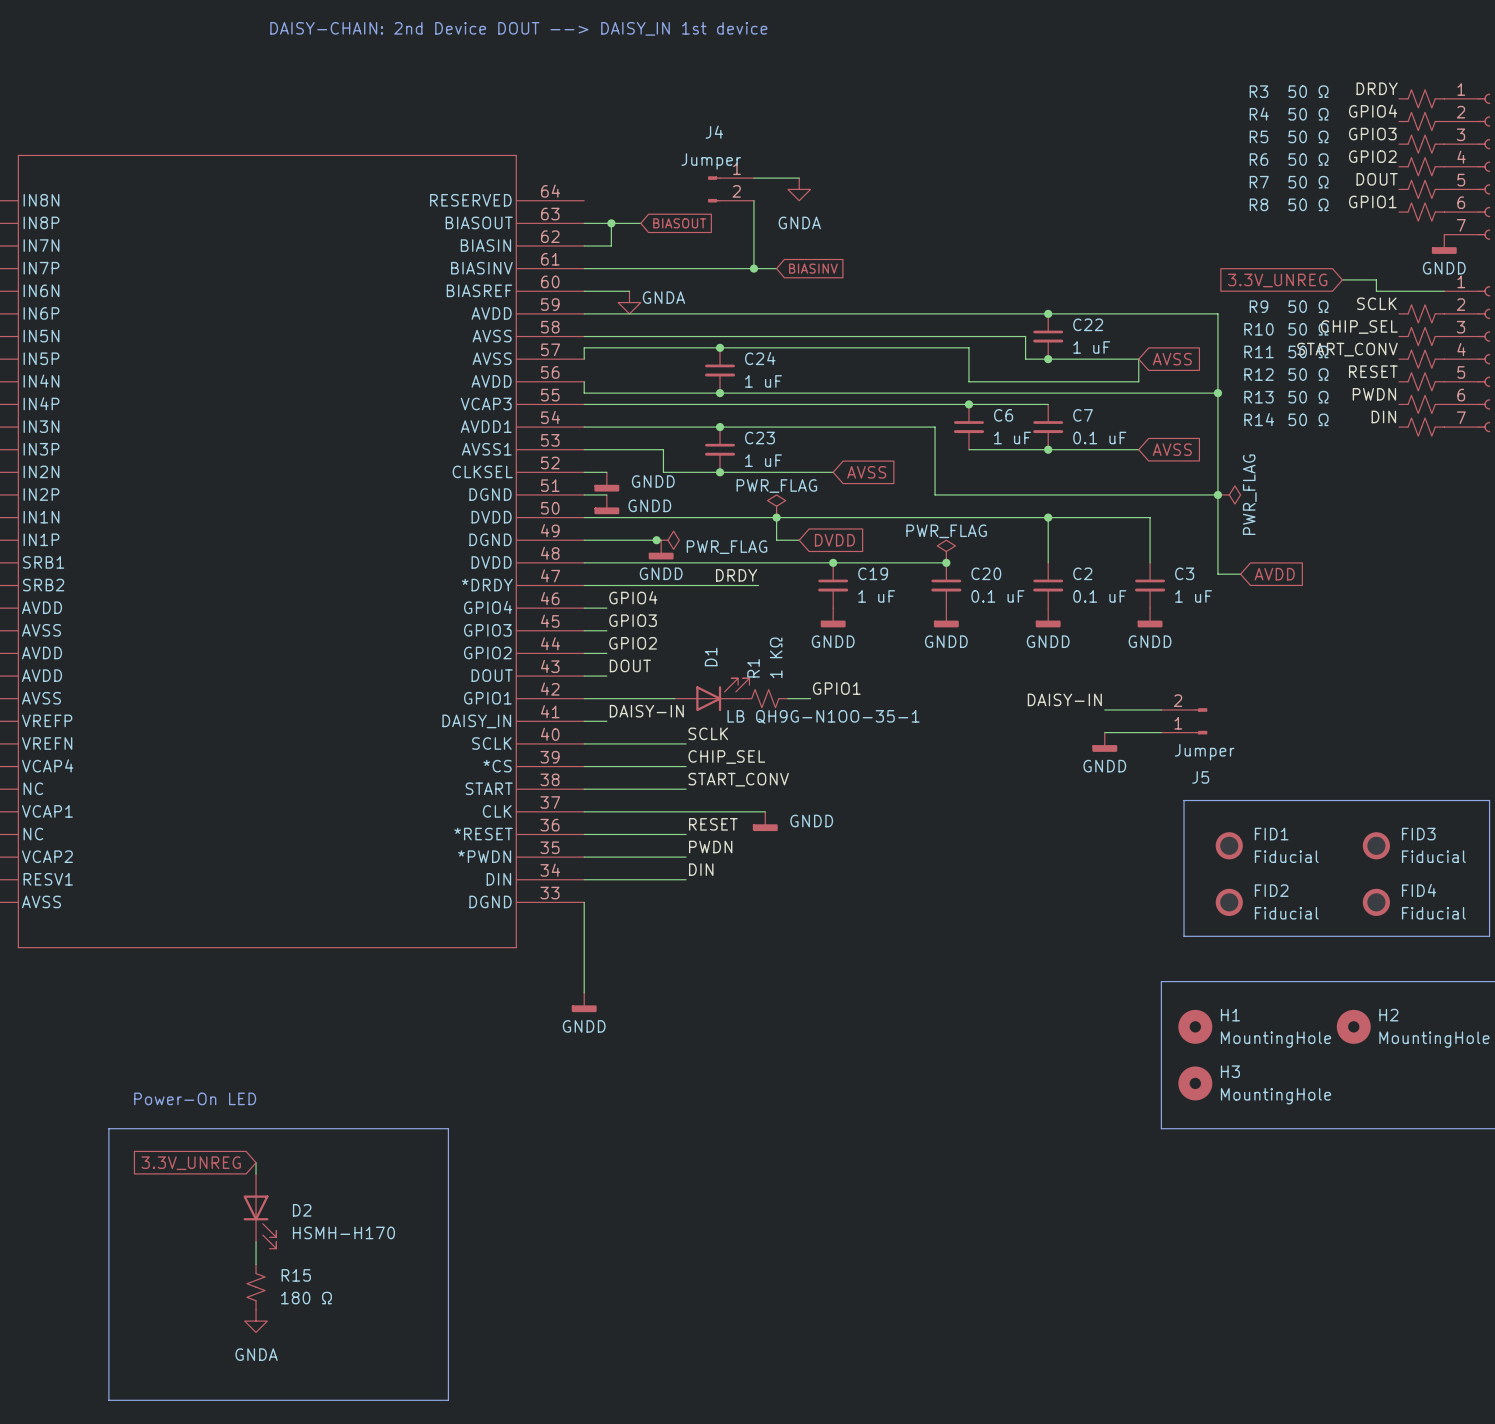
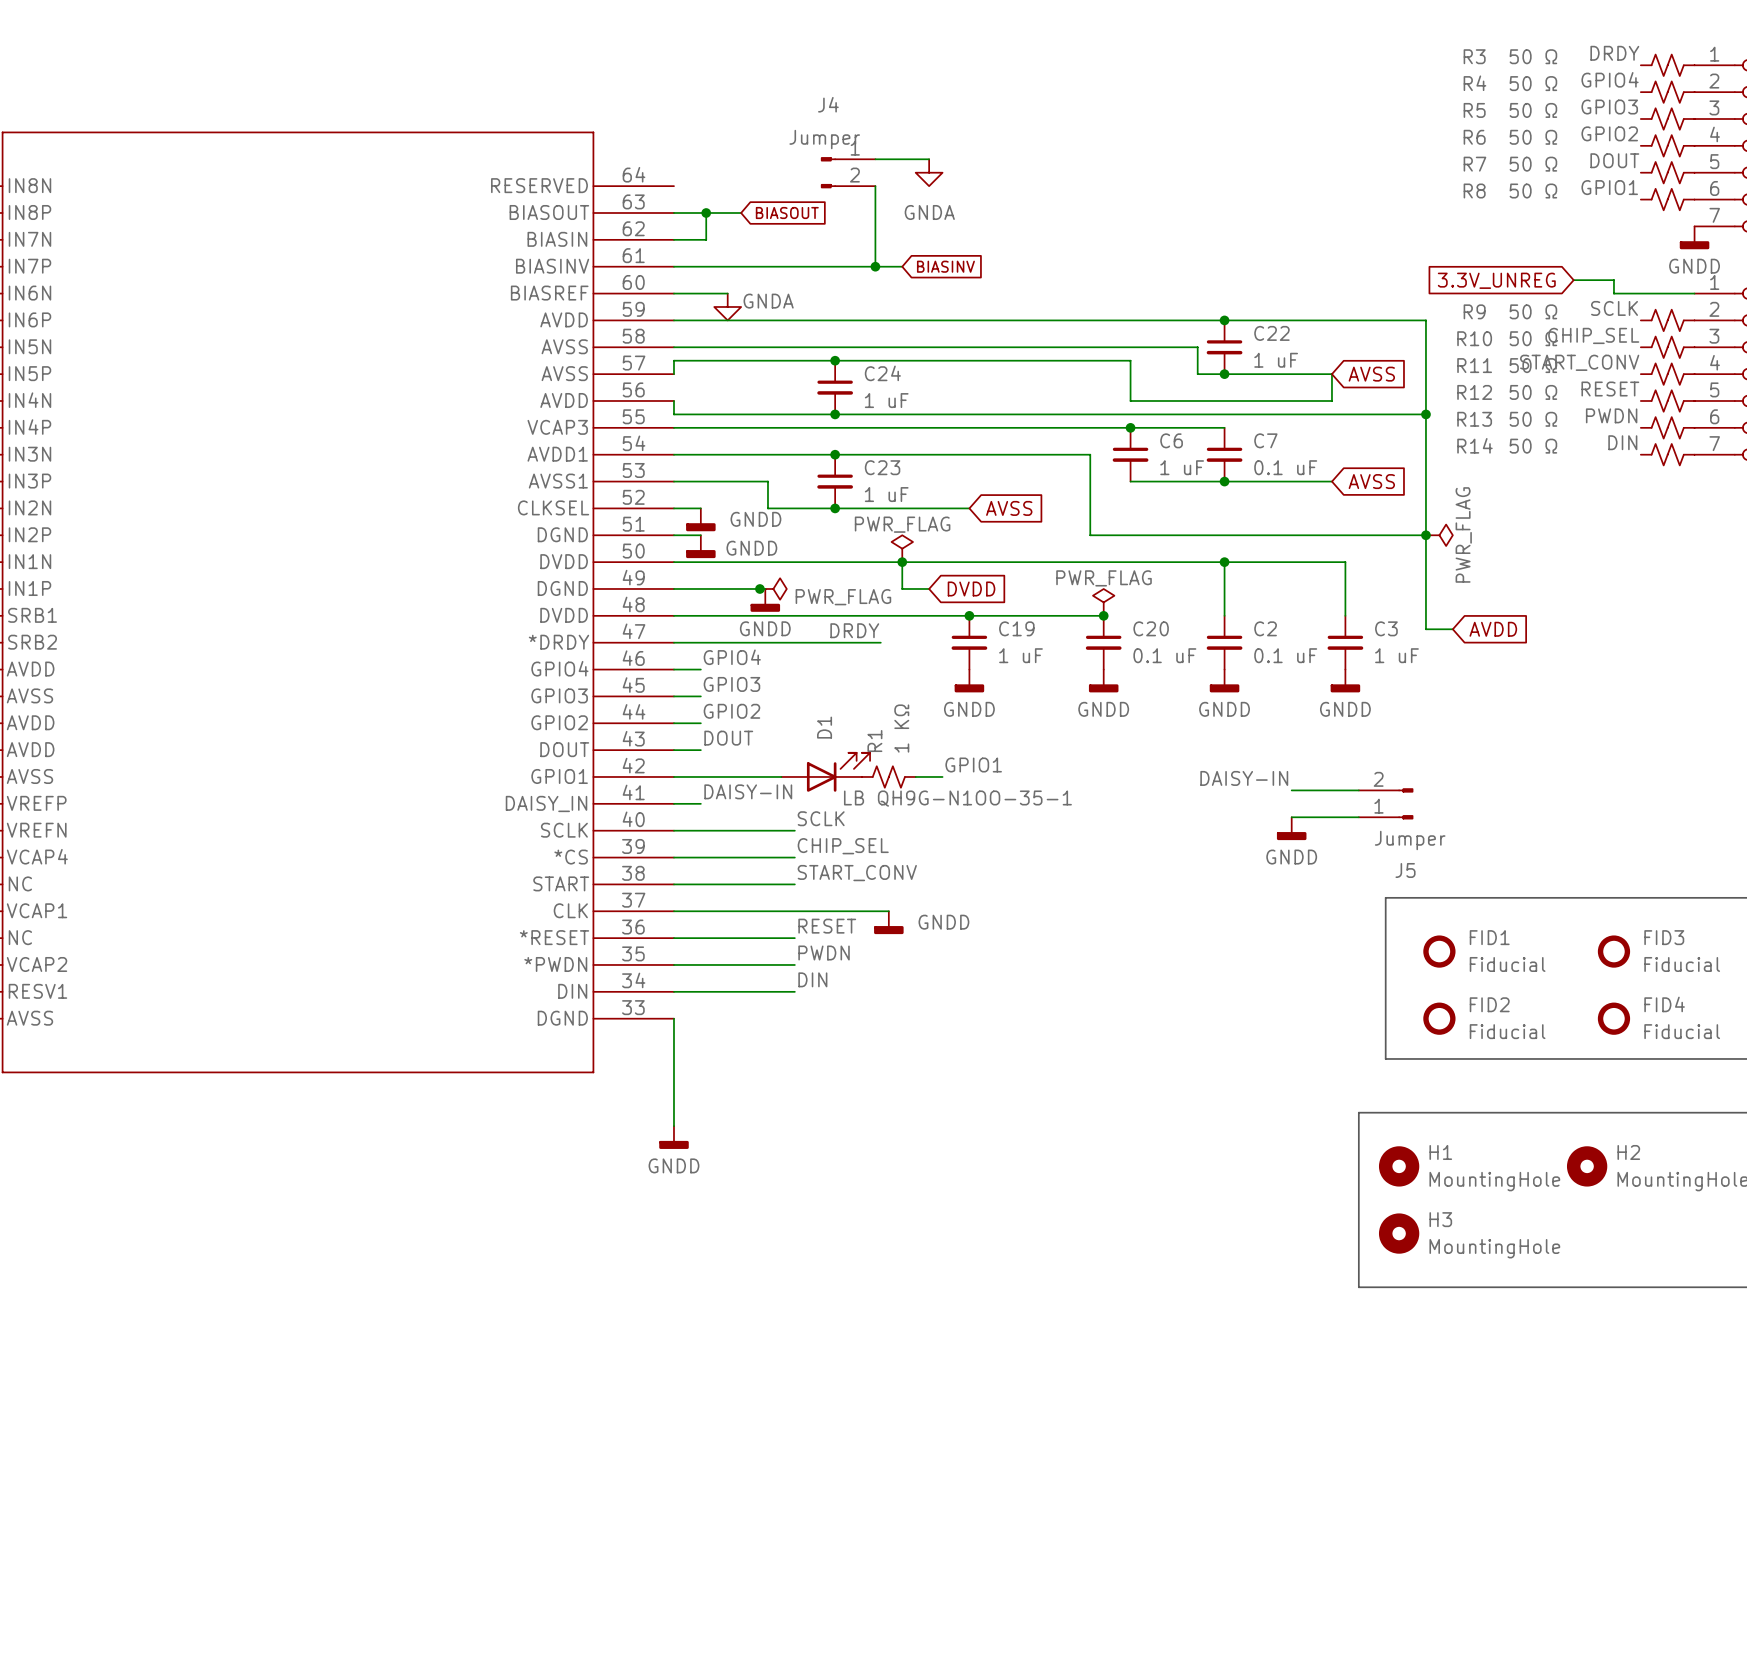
text: Power-On LED (195, 1098) -> none
line: (108, 1128) (448, 1128) (448, 1400) (108, 1400) (108, 1128) -> none
wire: (256, 1162) (256, 1173) -> none
global label: 3.3V_UNREG (191, 1163) -> none
D2: HSMH-H170 (259, 1211) -> none
wire: (256, 1241) (256, 1264) -> none
R15: 180 Ω (256, 1287) -> none
power symbol: GNDA (256, 1321) -> none

